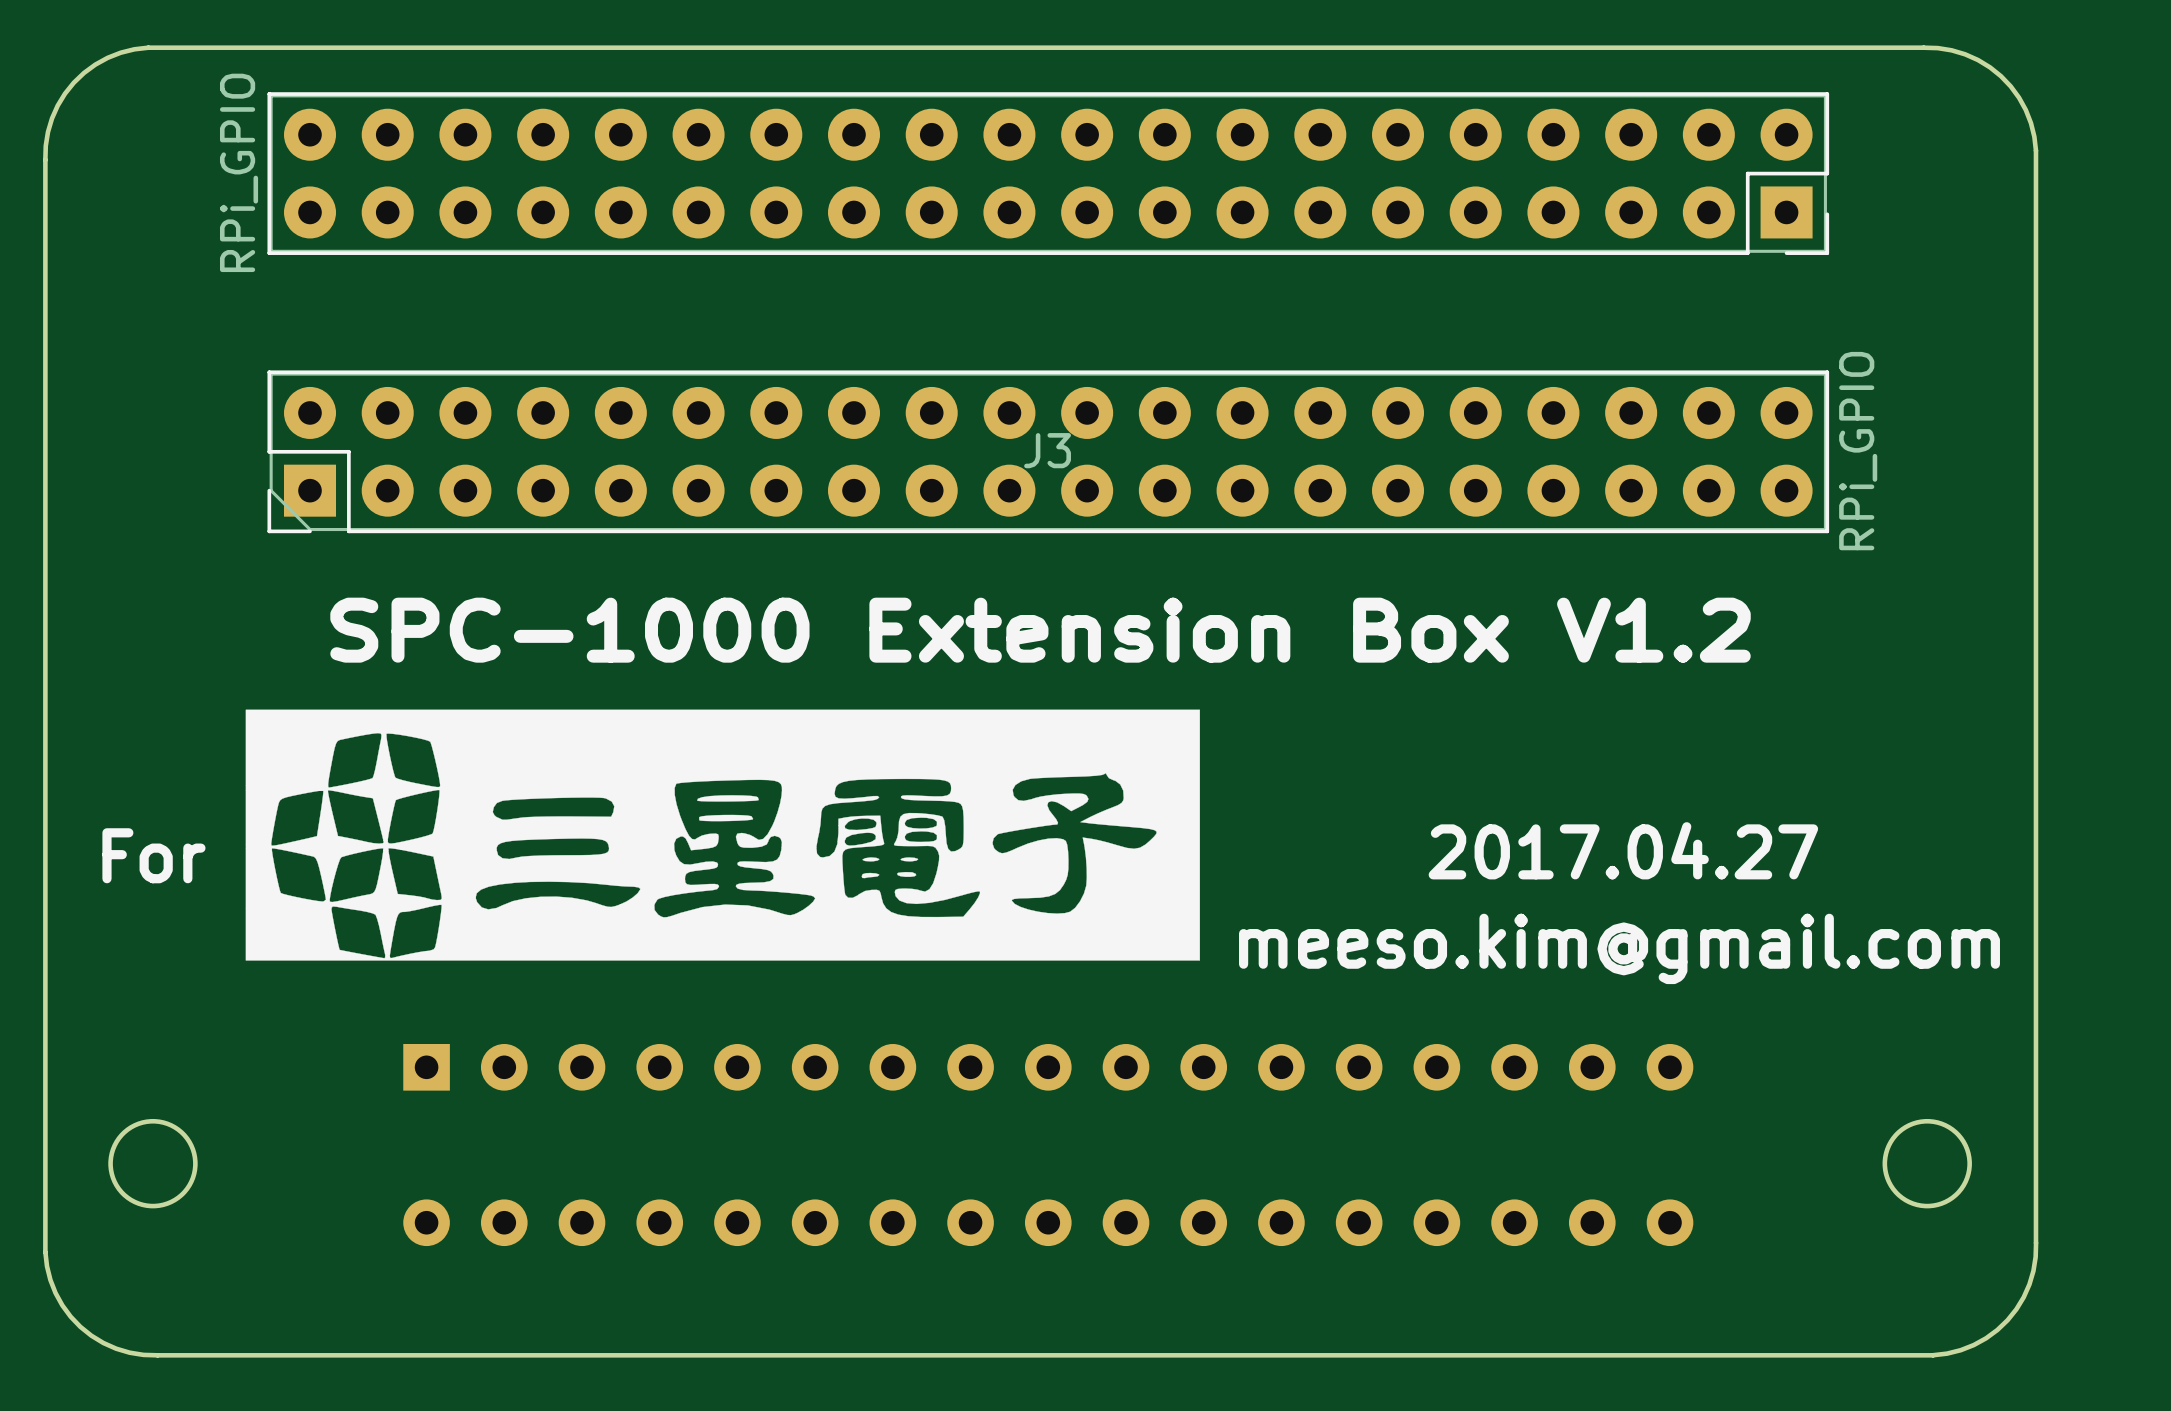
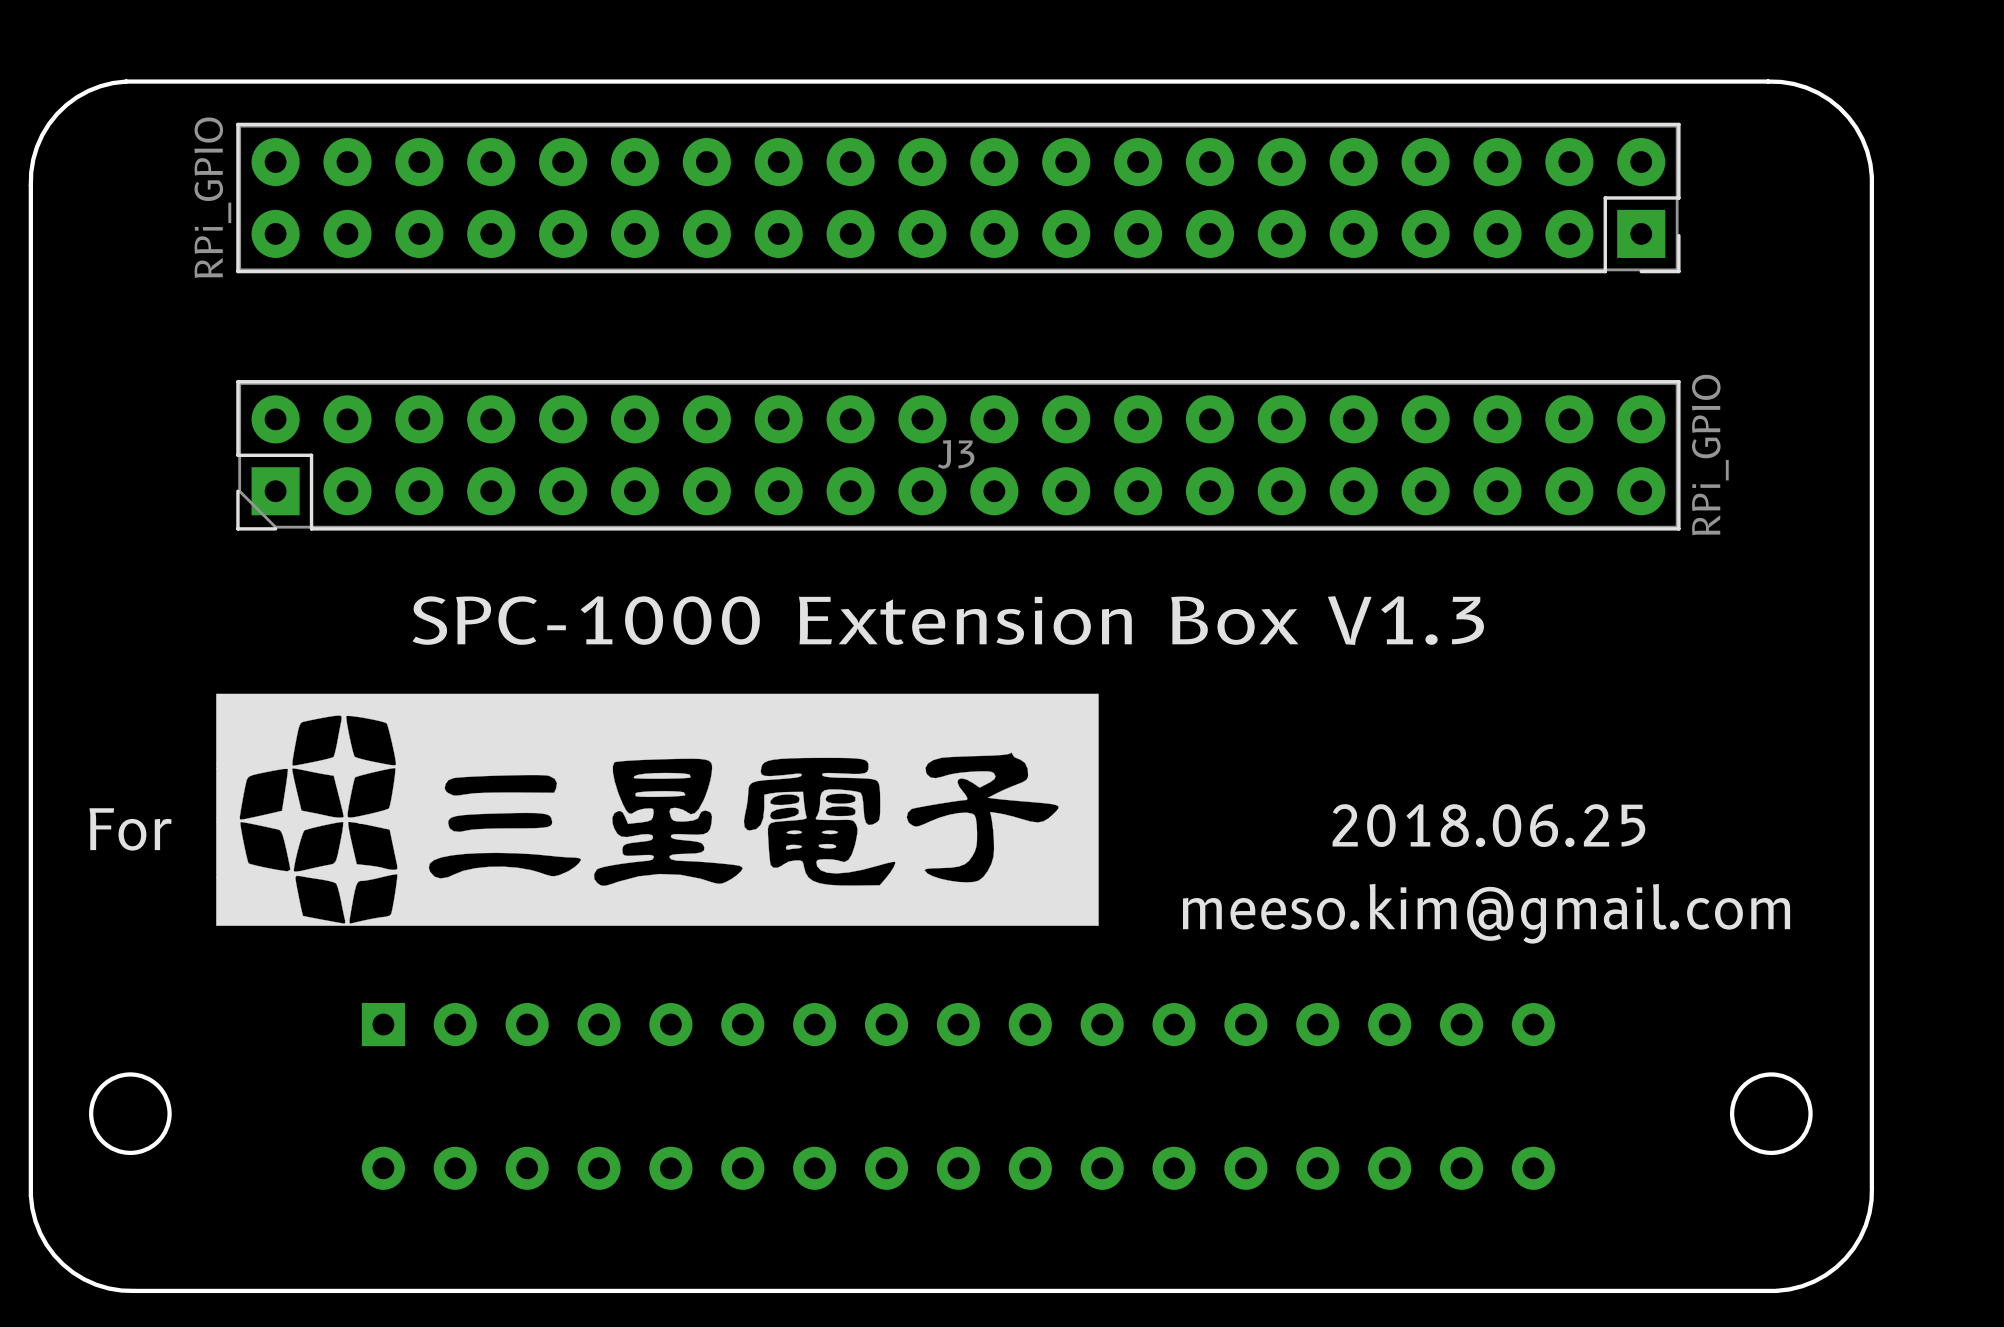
text: SPC-1000 Extension Box V1.2 (1040, 630) -> SPC-1000 Extension Box V1.3 (948, 620)
text: 2017.04.27 (1623, 850) -> 2018.06.25 (1488, 825)

